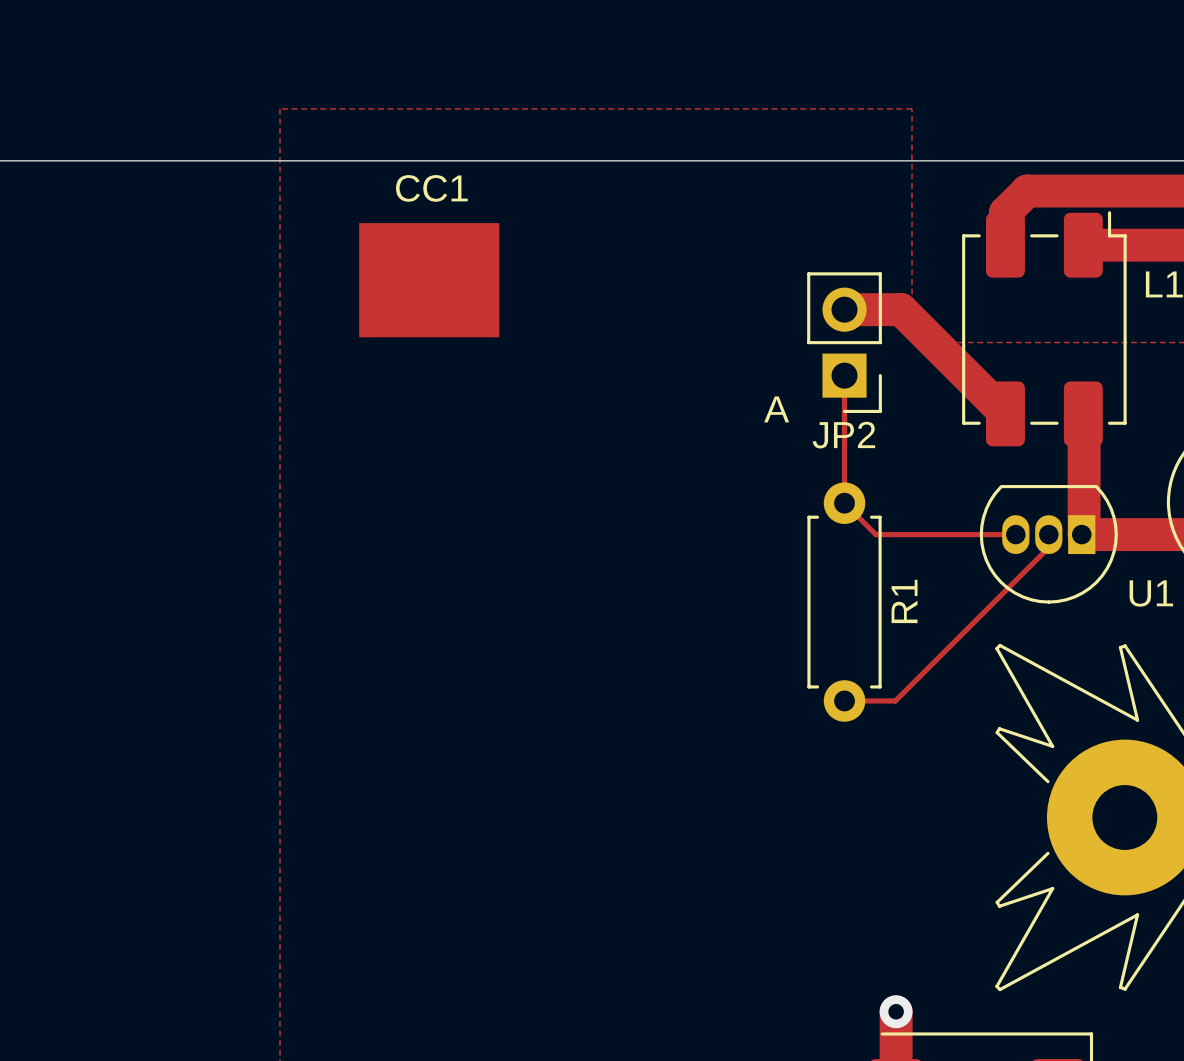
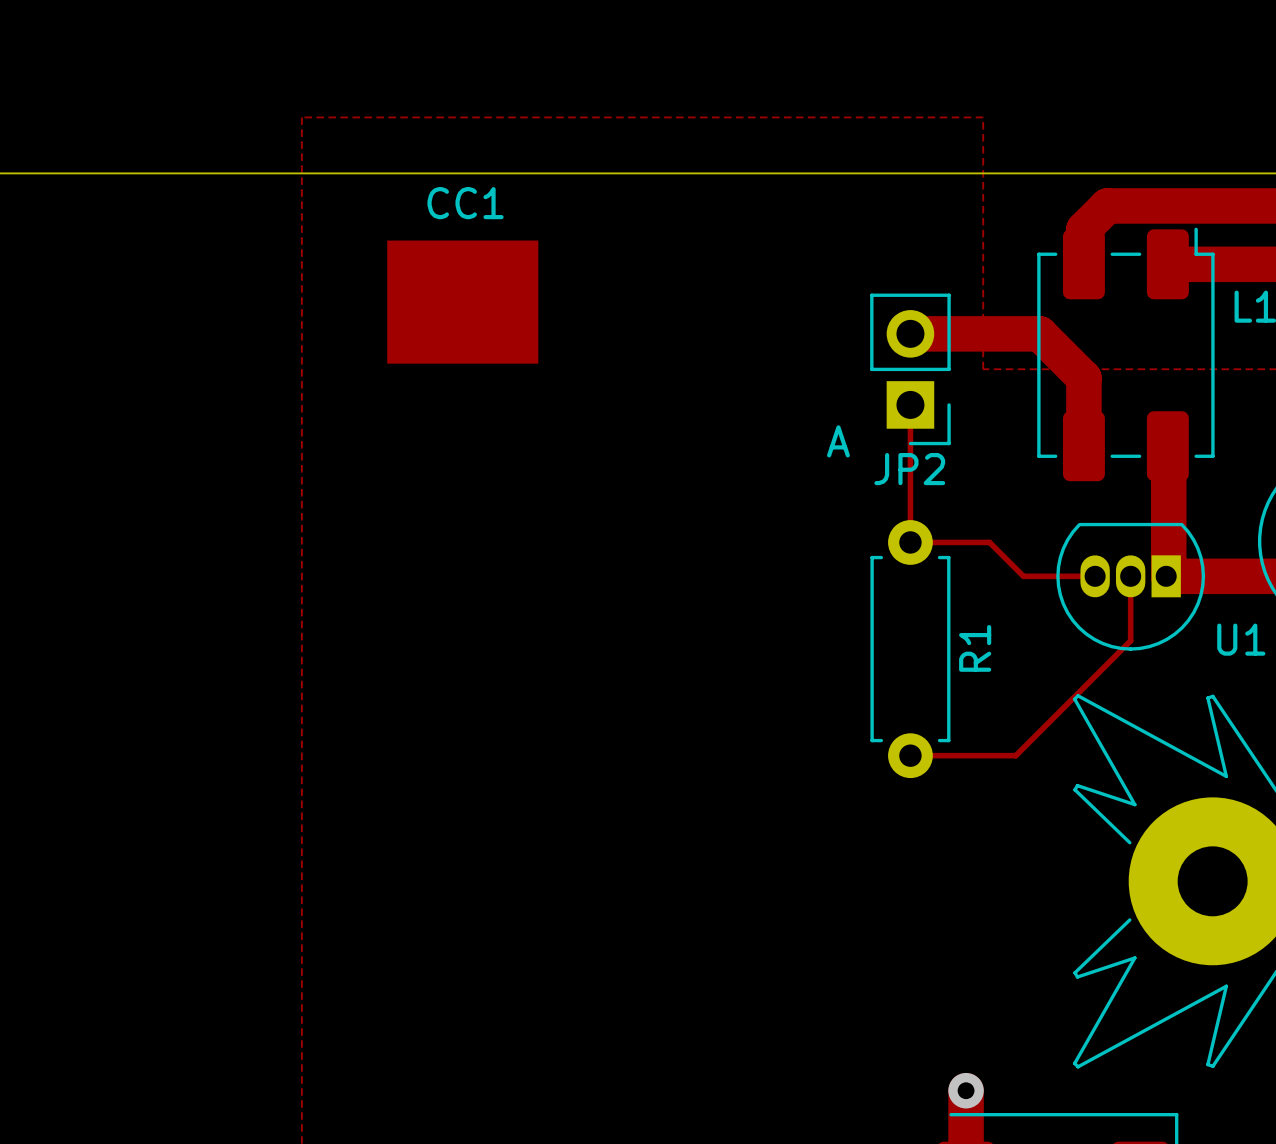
track: (901, 309) (1005, 413) -> (971, 333) (1039, 333) (1083, 378) (1083, 446)
track: (844, 503) (875, 534) (949, 534) -> (910, 542) (989, 542) (1023, 576)
track: (1048, 547) (895, 700) -> (1130, 590) (1130, 640) (1015, 755) (965, 755)

